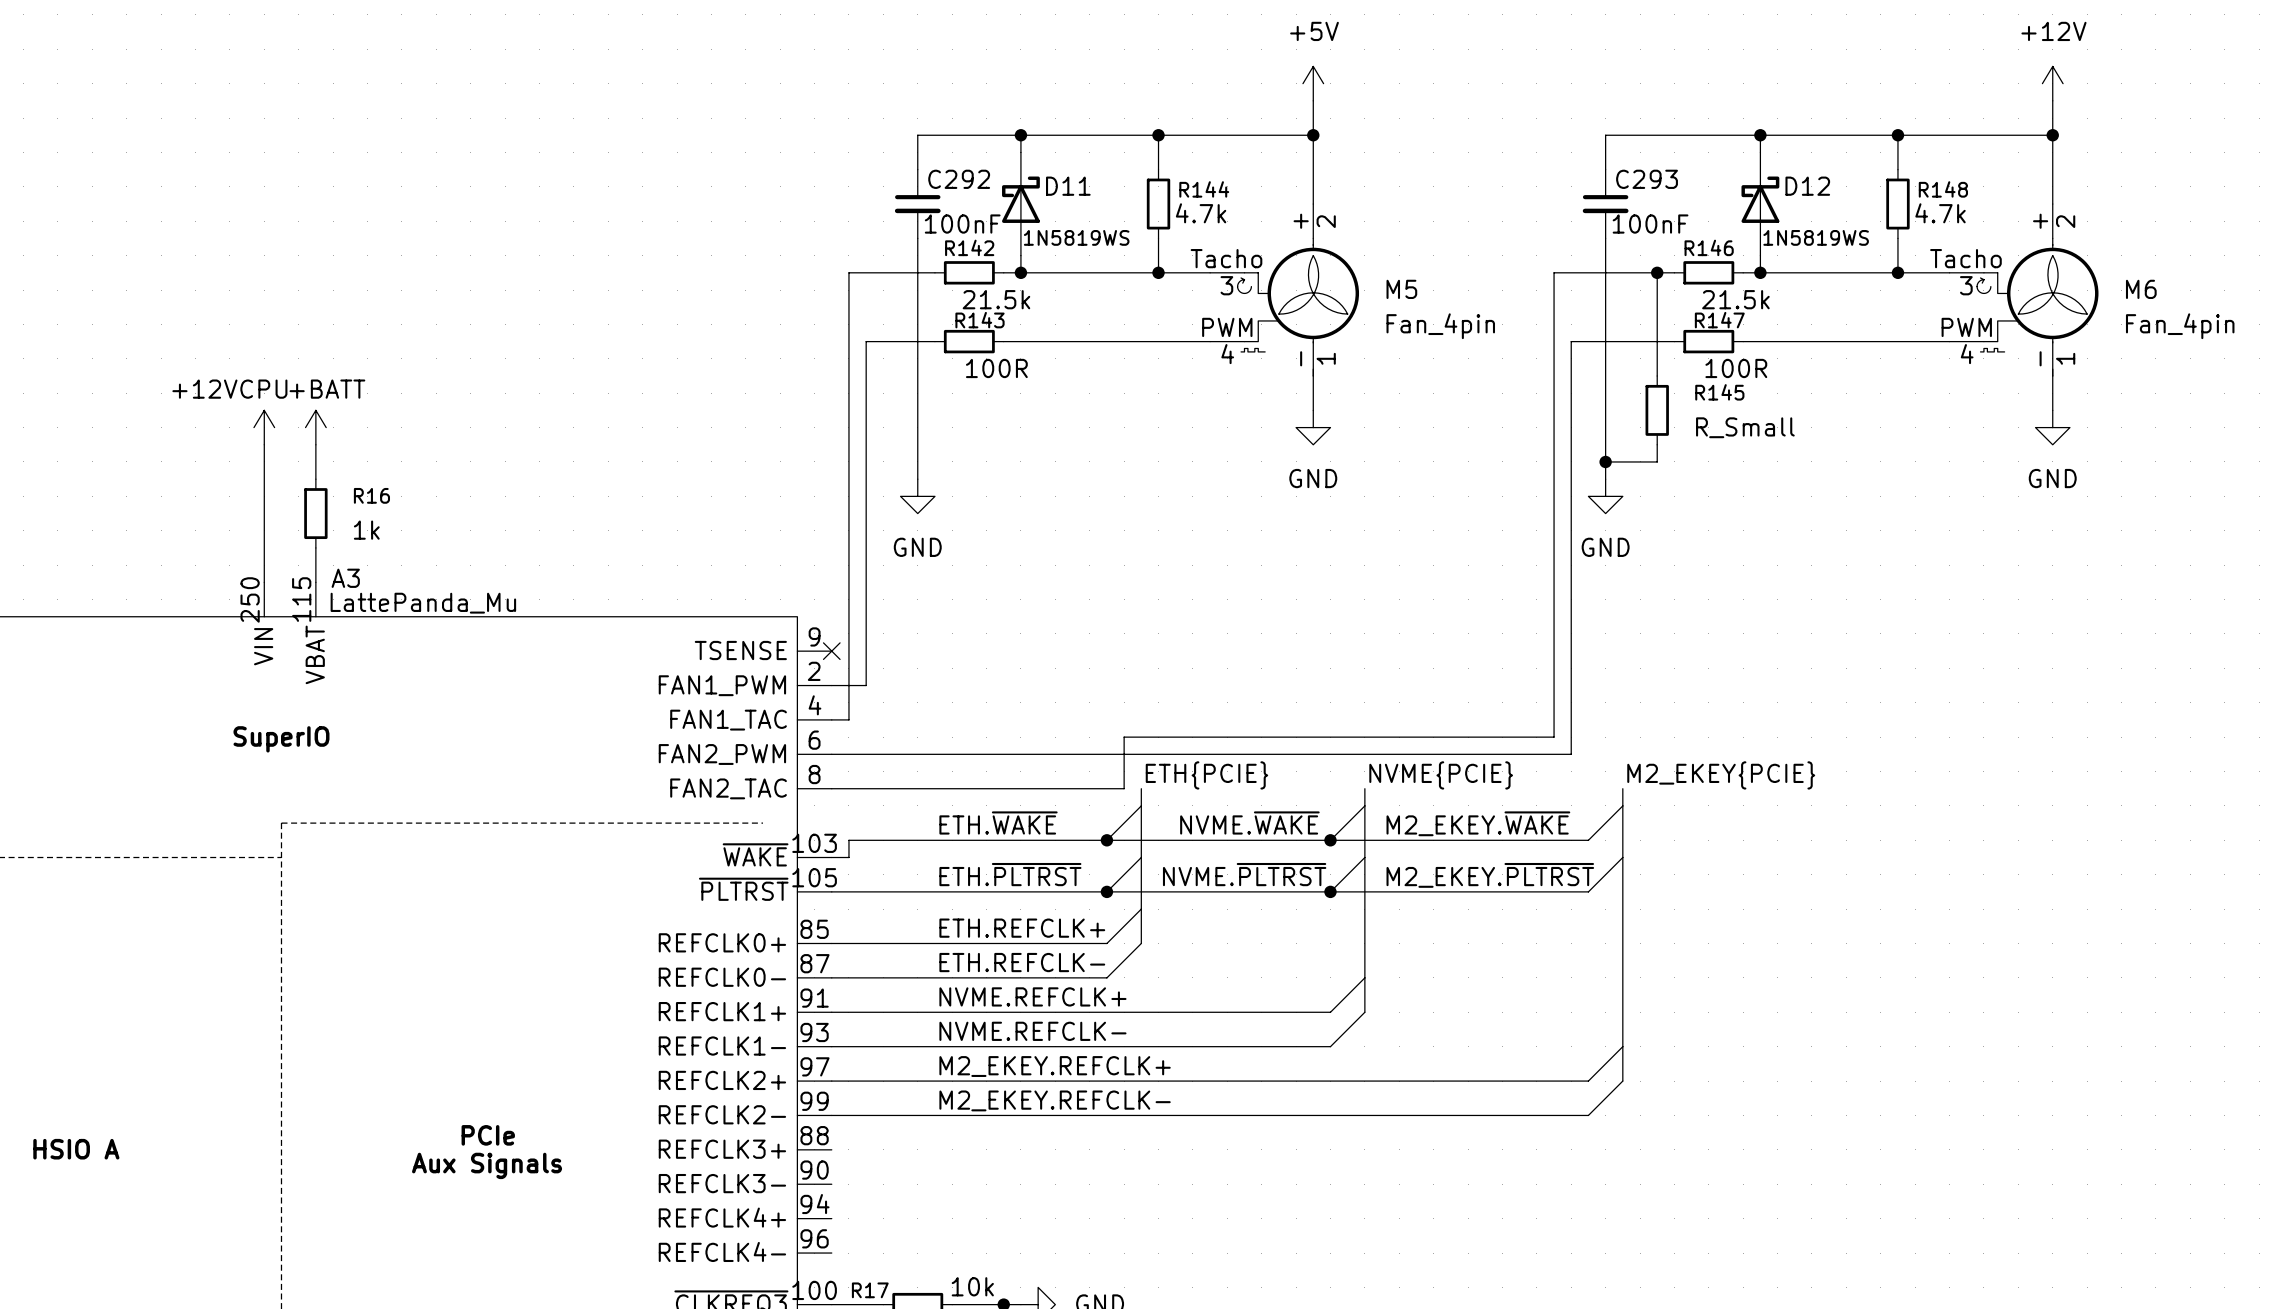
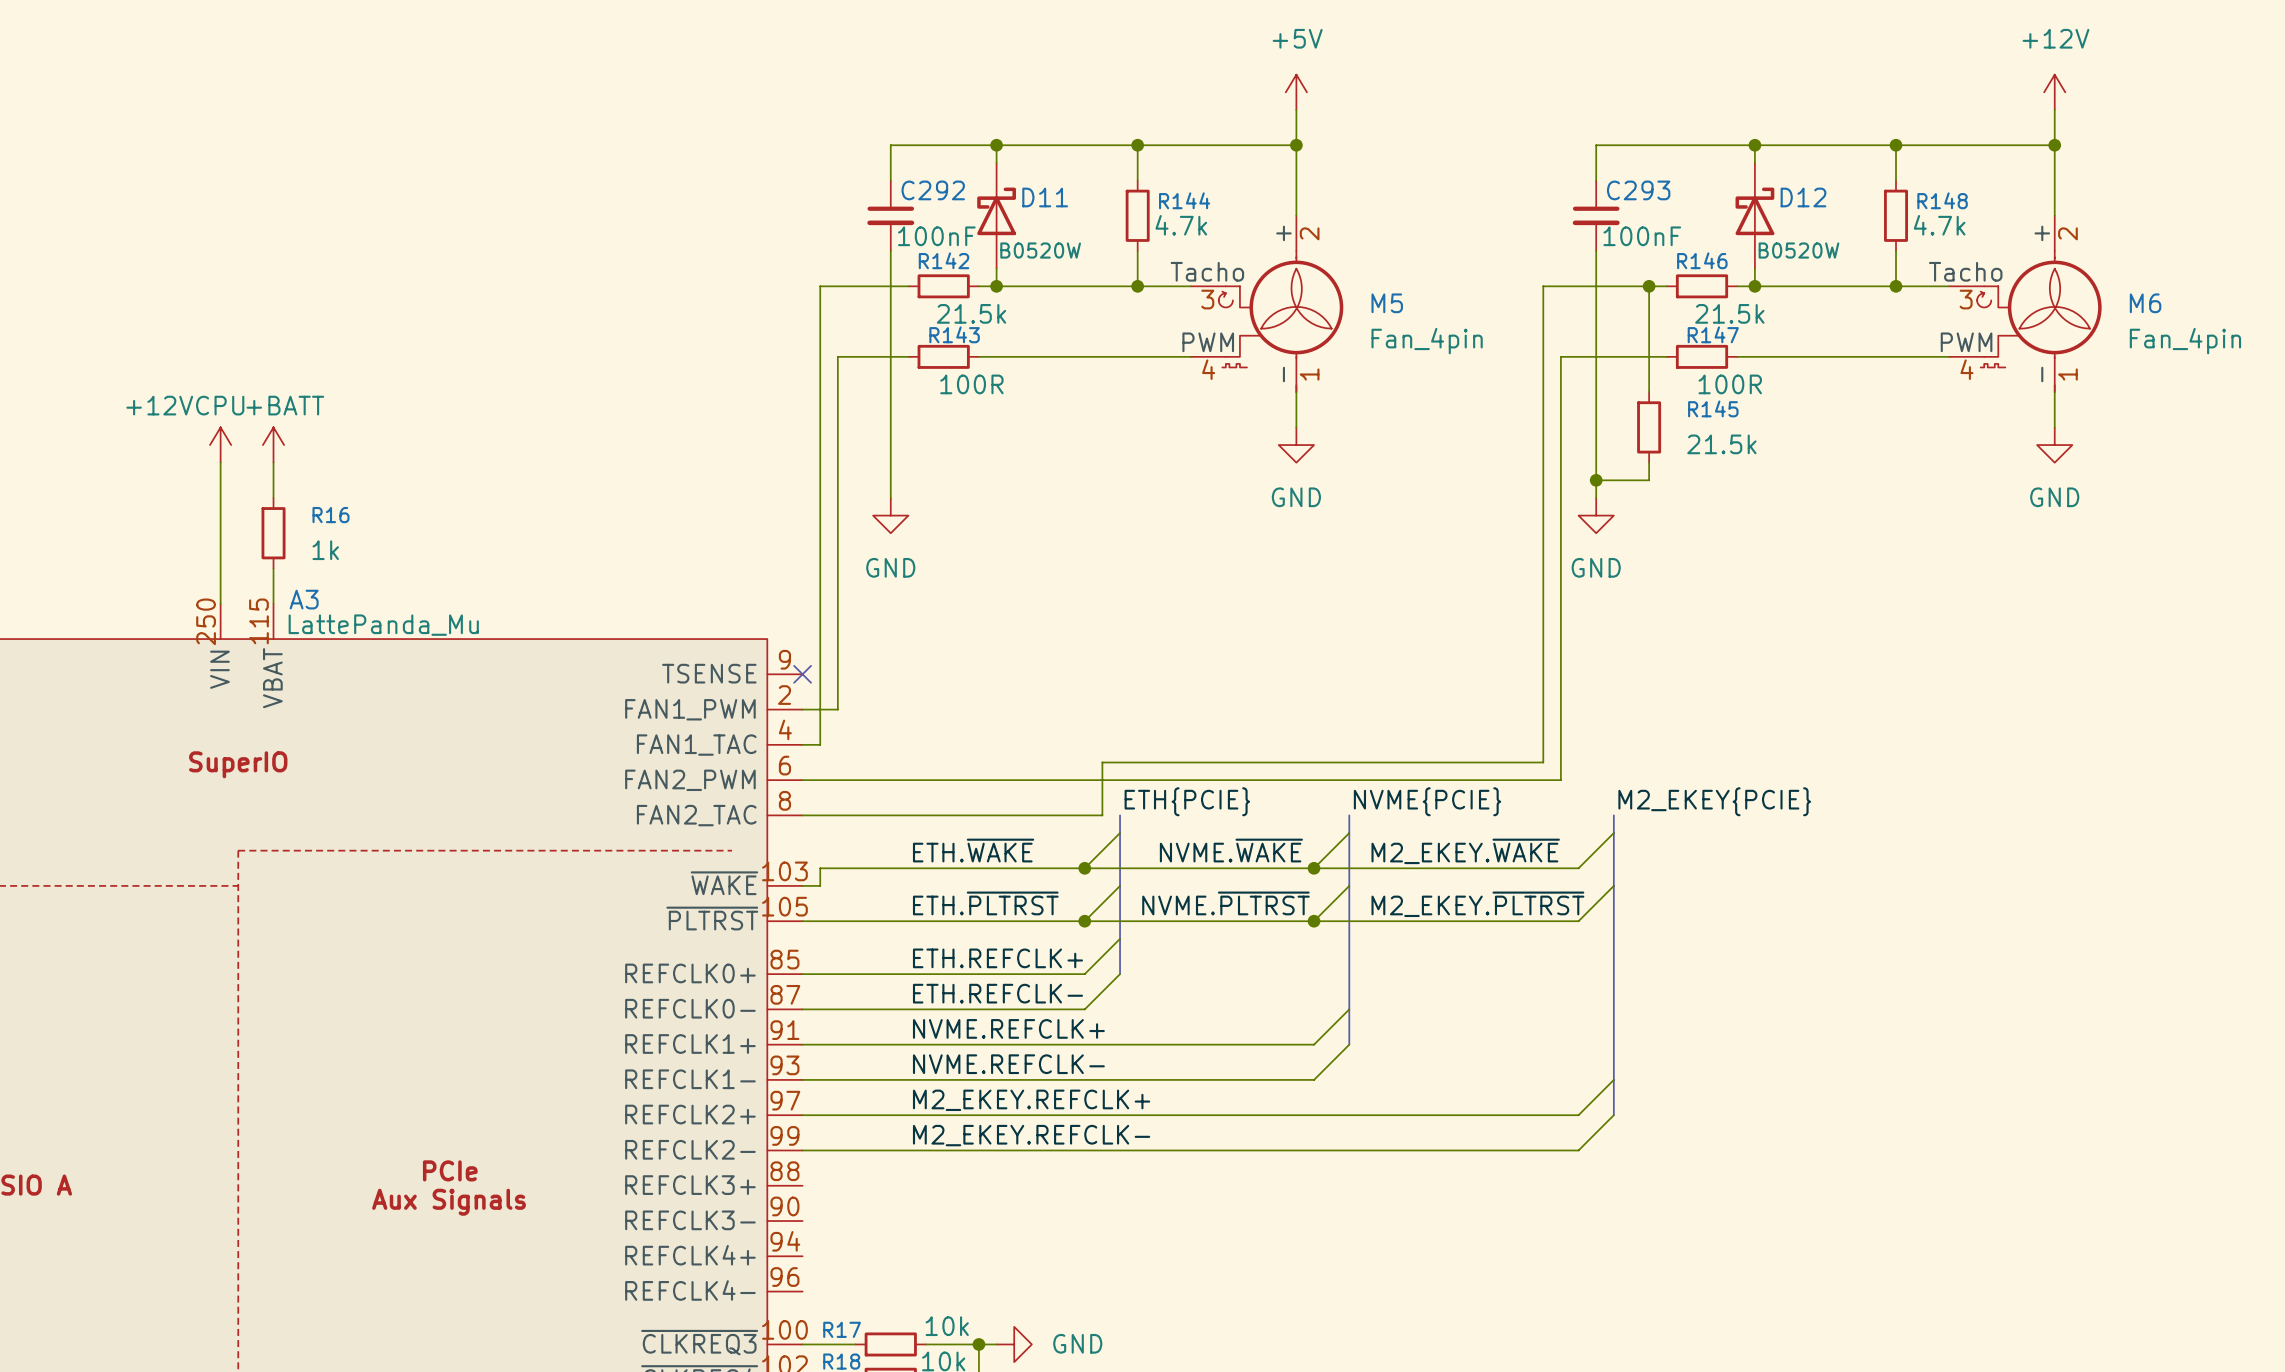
D11 value: 1N5819WS (1076, 237) -> B0520W (1040, 250)
D12 value: 1N5819WS (1816, 237) -> B0520W (1798, 250)
R145 value: R_Small (1745, 427) -> 21.5k (1721, 444)

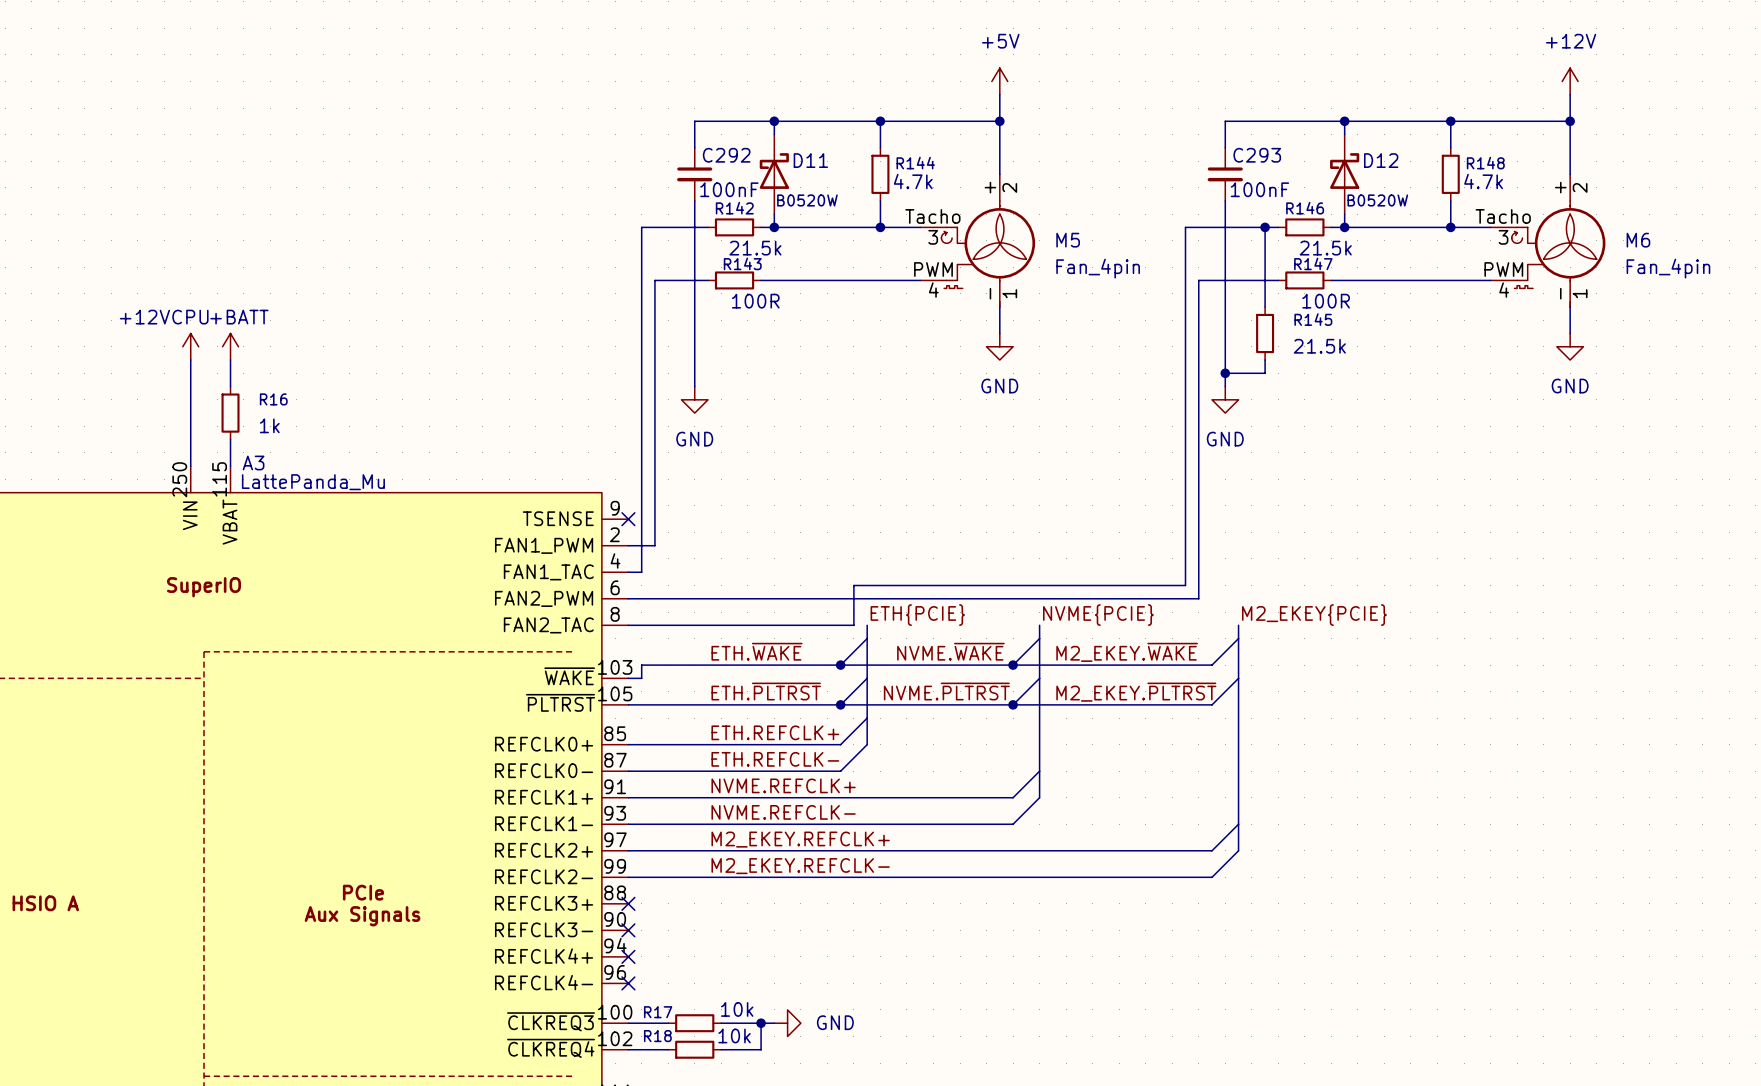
no-connect mark: none -> (628, 903)
no-connect mark: none -> (628, 930)
no-connect mark: none -> (628, 956)
no-connect mark: none -> (628, 983)

